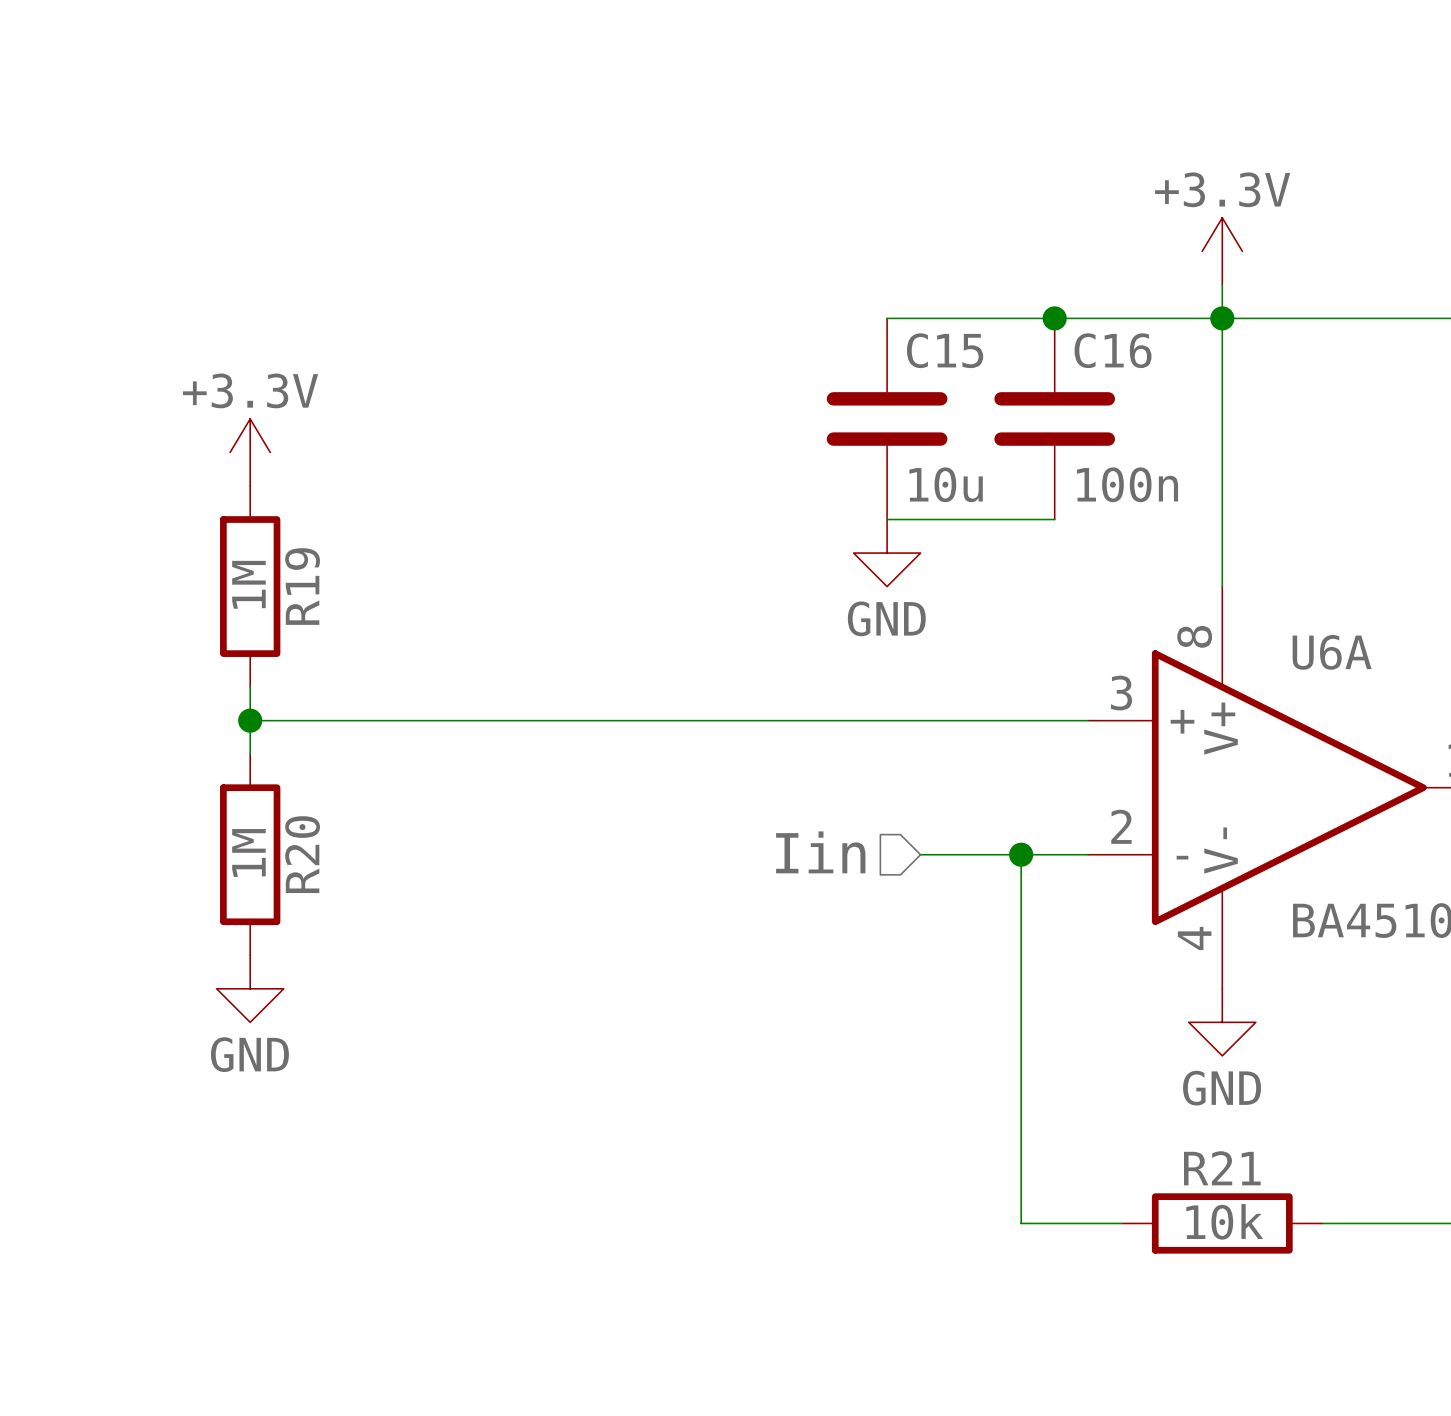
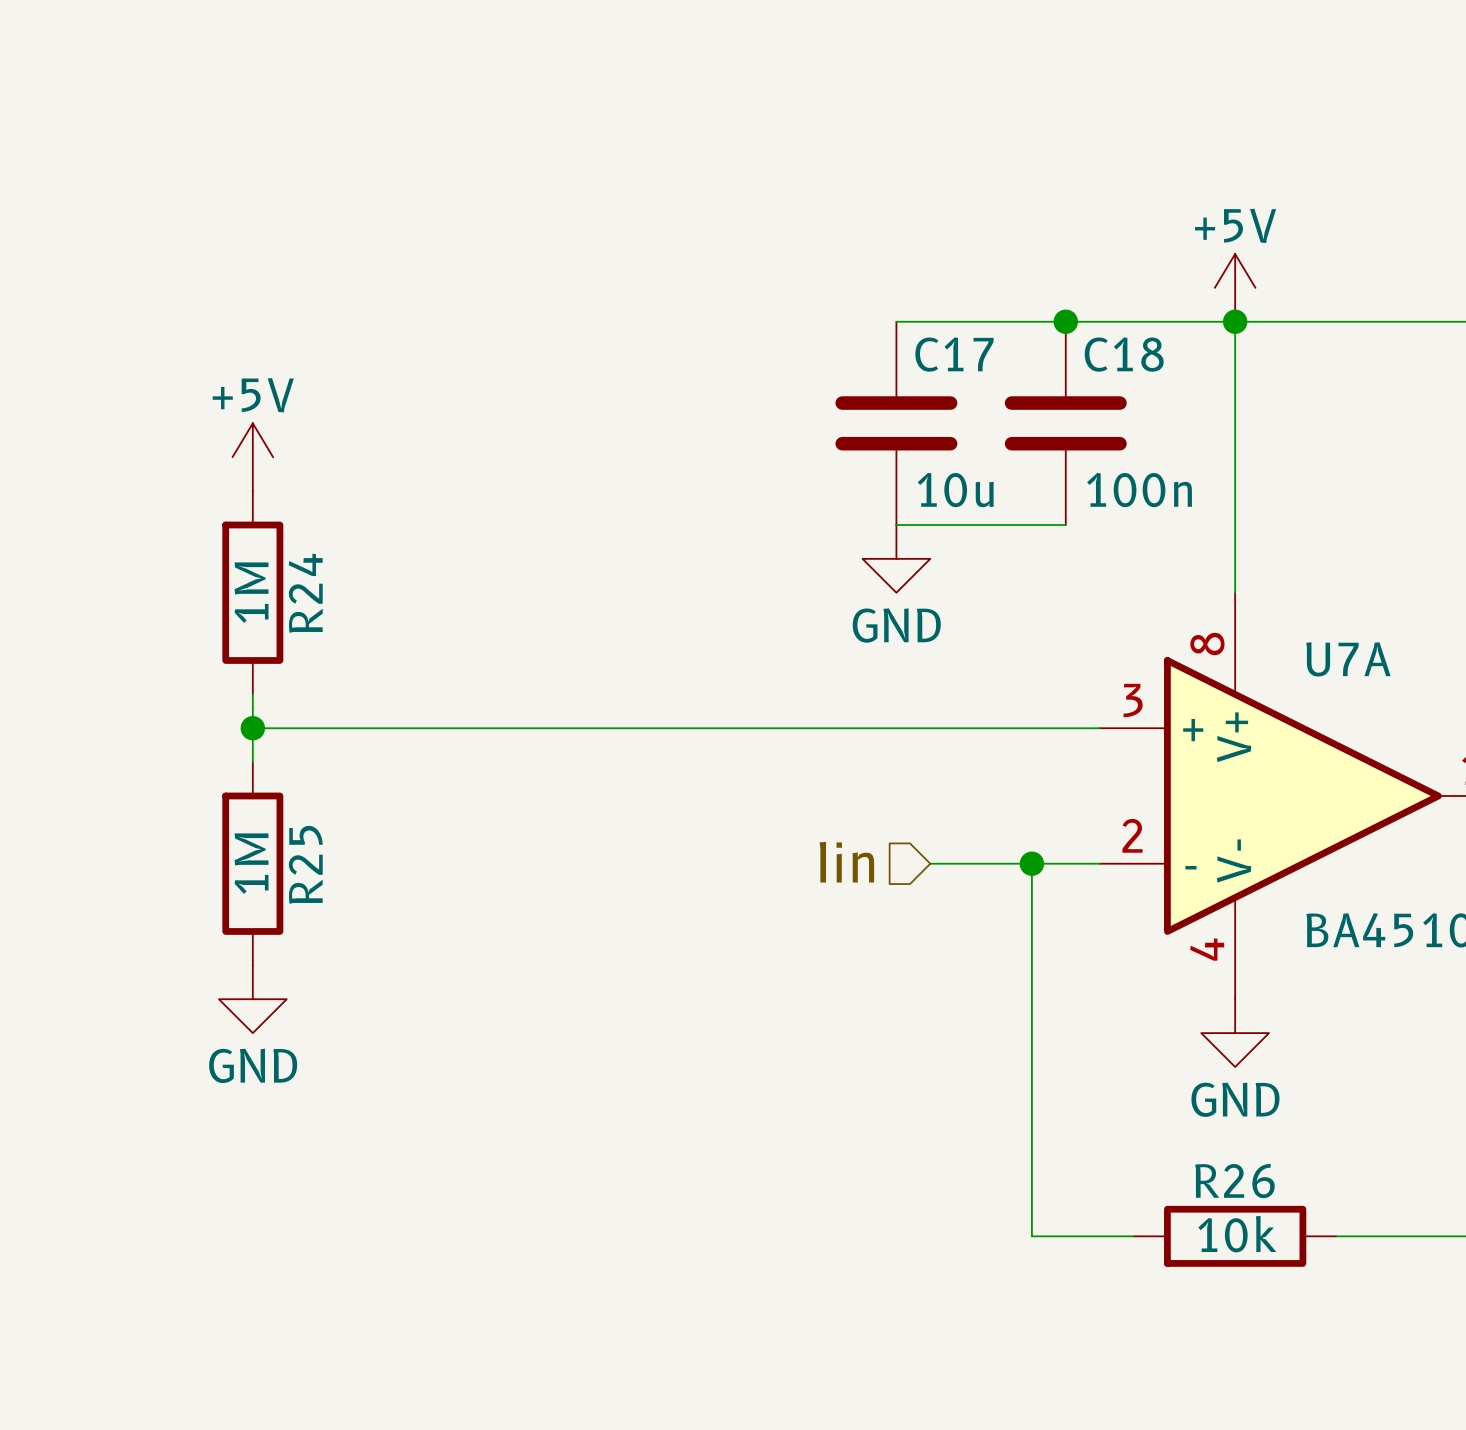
power symbol: +3.3V (1222, 251) -> none
power symbol: none -> +5V (1235, 287)
C15 name: C15 (945, 350) -> C17 (954, 354)
C16 name: C16 (1113, 350) -> C18 (1124, 354)
power symbol: +3.3V (250, 452) -> +5V (252, 457)
R19 name: R19 (302, 586) -> R24 (305, 593)
U6A name: U6A (1332, 652) -> U7A (1348, 659)
R20 name: R20 (302, 854) -> R25 (305, 864)
R21 name: R21 (1222, 1168) -> R26 (1234, 1181)

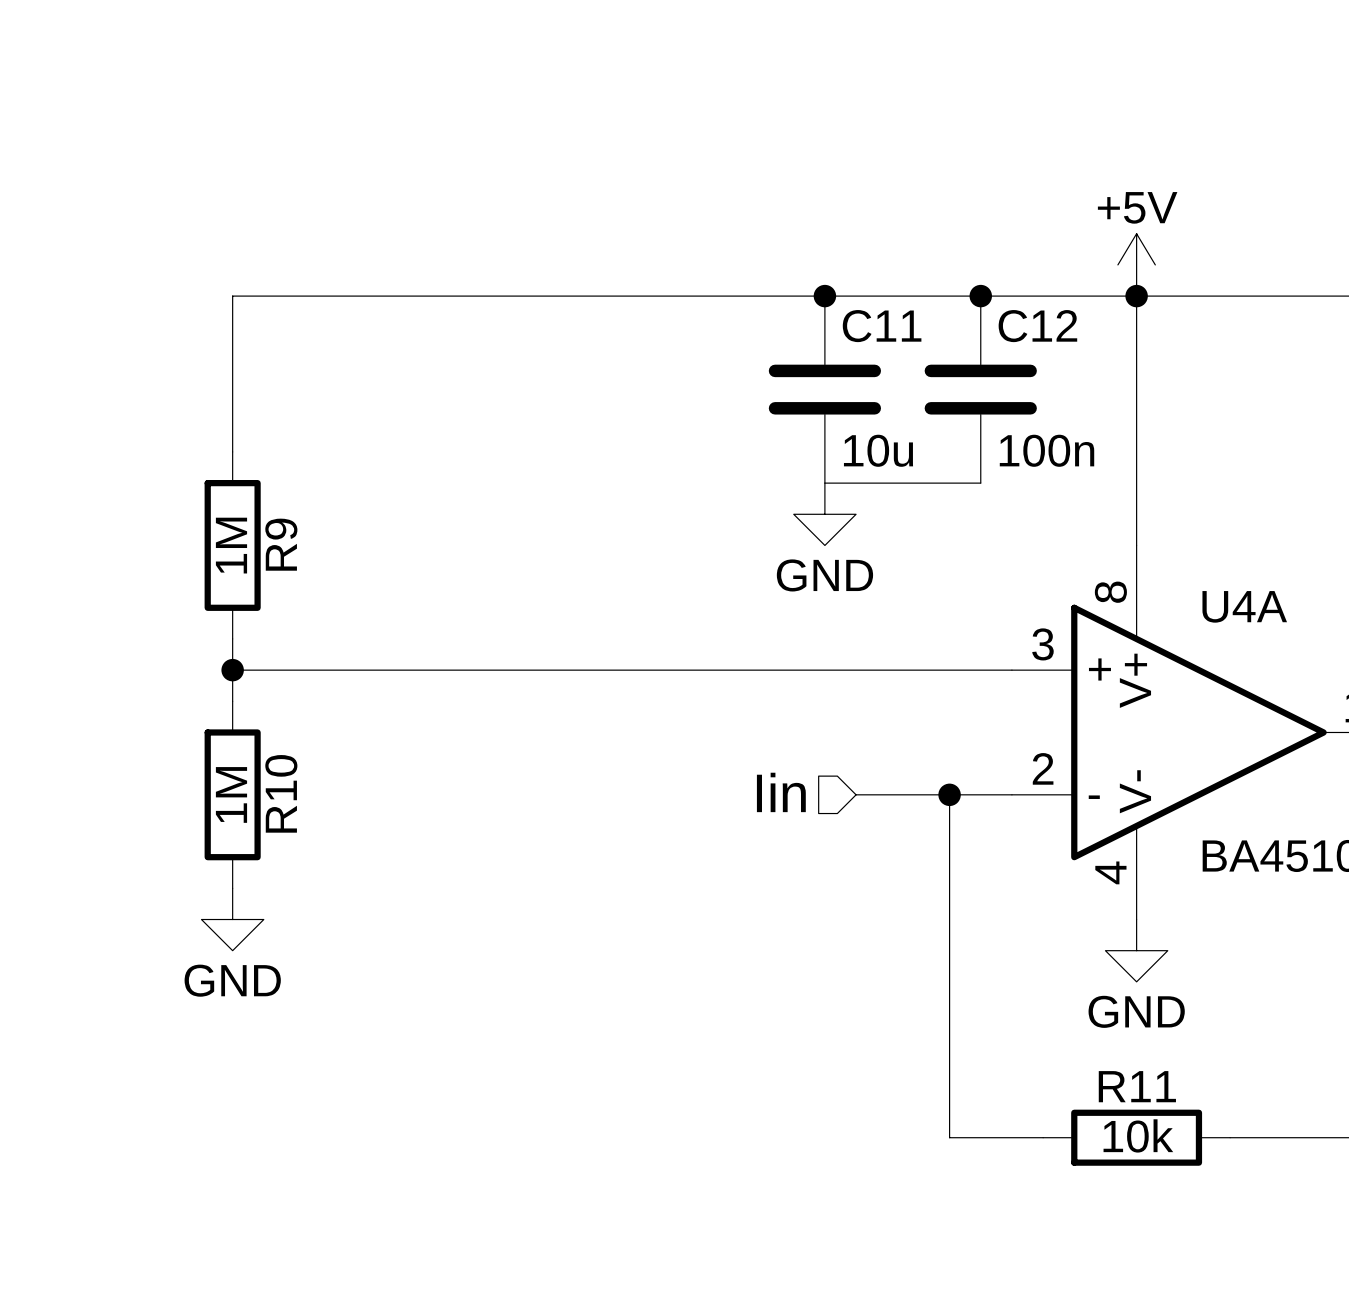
wire: none -> (824, 296) (232, 296) (232, 451)
junction: none -> (824, 296)
C17 name: C17 (954, 354) -> C11 (882, 326)
C18 name: C18 (1124, 354) -> C12 (1037, 326)
power symbol: +5V (252, 457) -> none
R24 name: R24 (305, 593) -> R9 (281, 544)
U7A name: U7A (1348, 659) -> U4A (1244, 606)
R25 name: R25 (305, 864) -> R10 (281, 793)
R26 name: R26 (1234, 1181) -> R11 (1137, 1086)

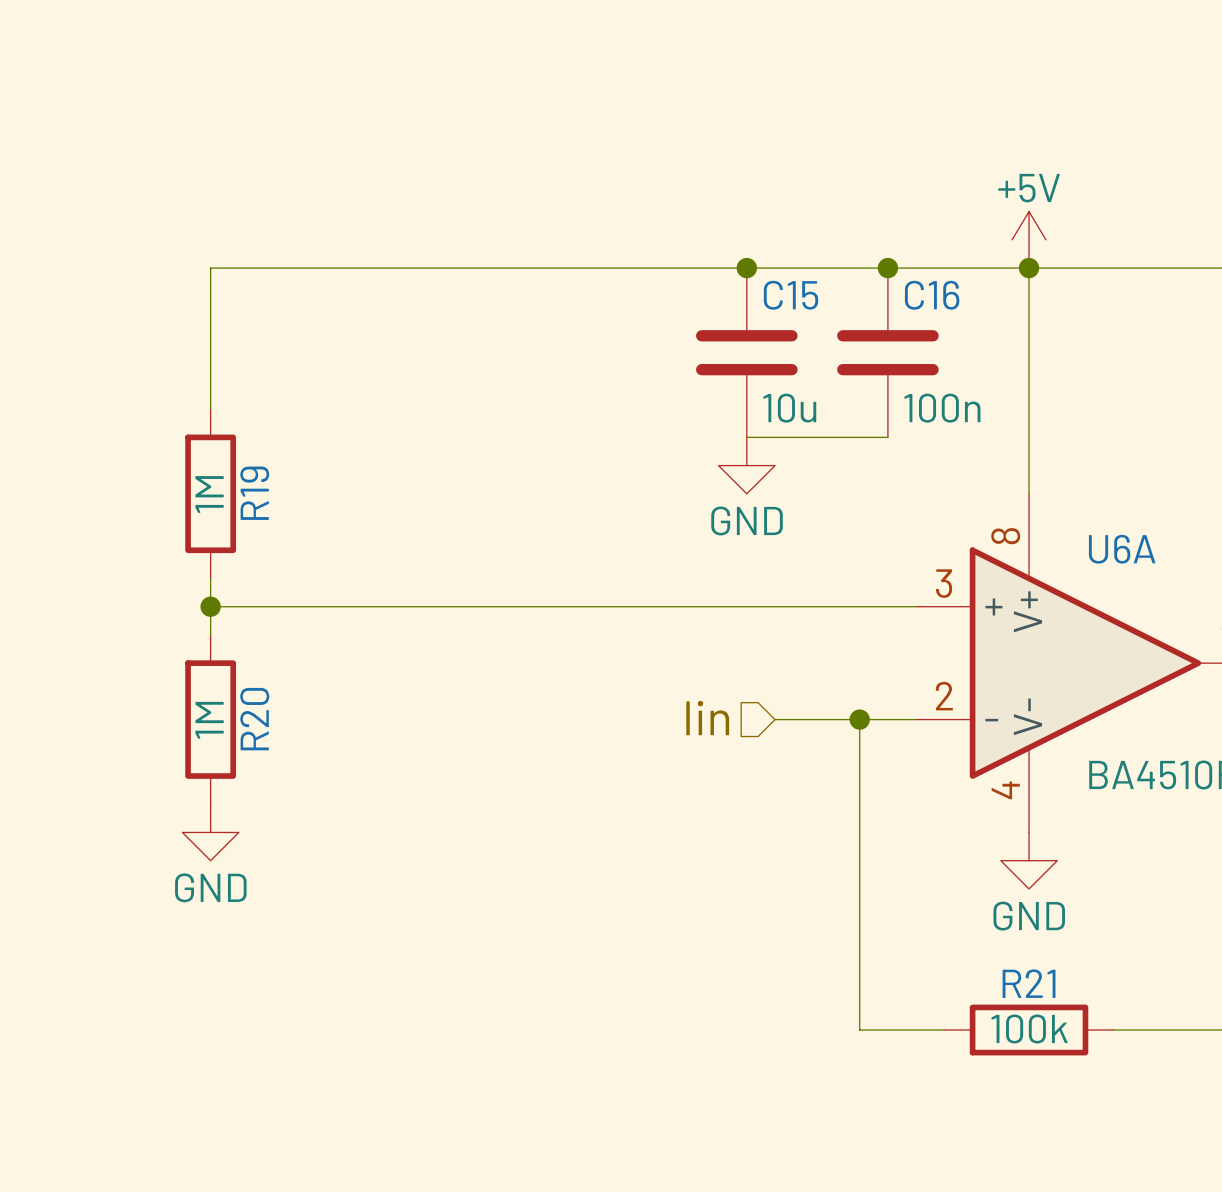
C11 name: C11 (882, 326) -> C15 (791, 295)
C12 name: C12 (1037, 326) -> C16 (932, 295)
R9 name: R9 (281, 544) -> R19 (254, 493)
U4A name: U4A (1244, 606) -> U6A (1122, 549)
R10 name: R10 (281, 793) -> R20 (254, 719)
R11 name: R11 (1137, 1086) -> R21 (1029, 983)
R11 value: 10k (1138, 1135) -> 100k (1029, 1028)

